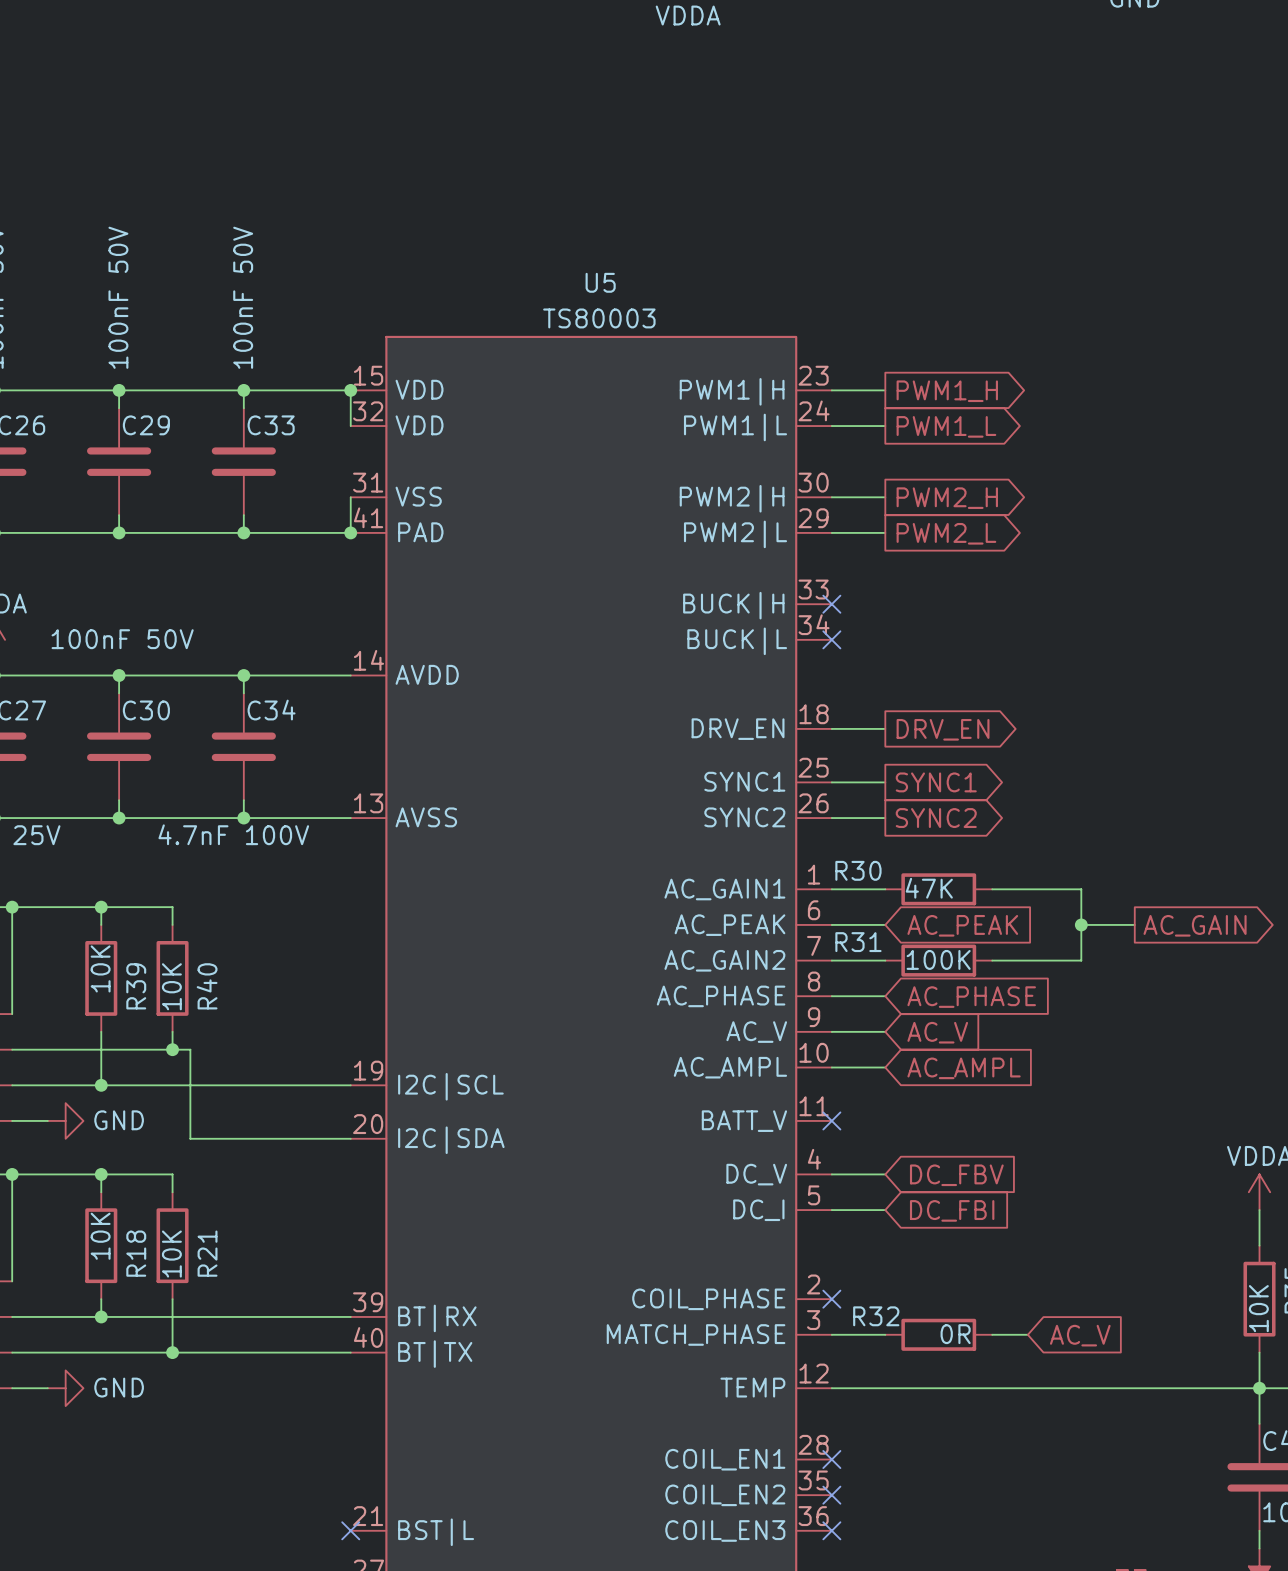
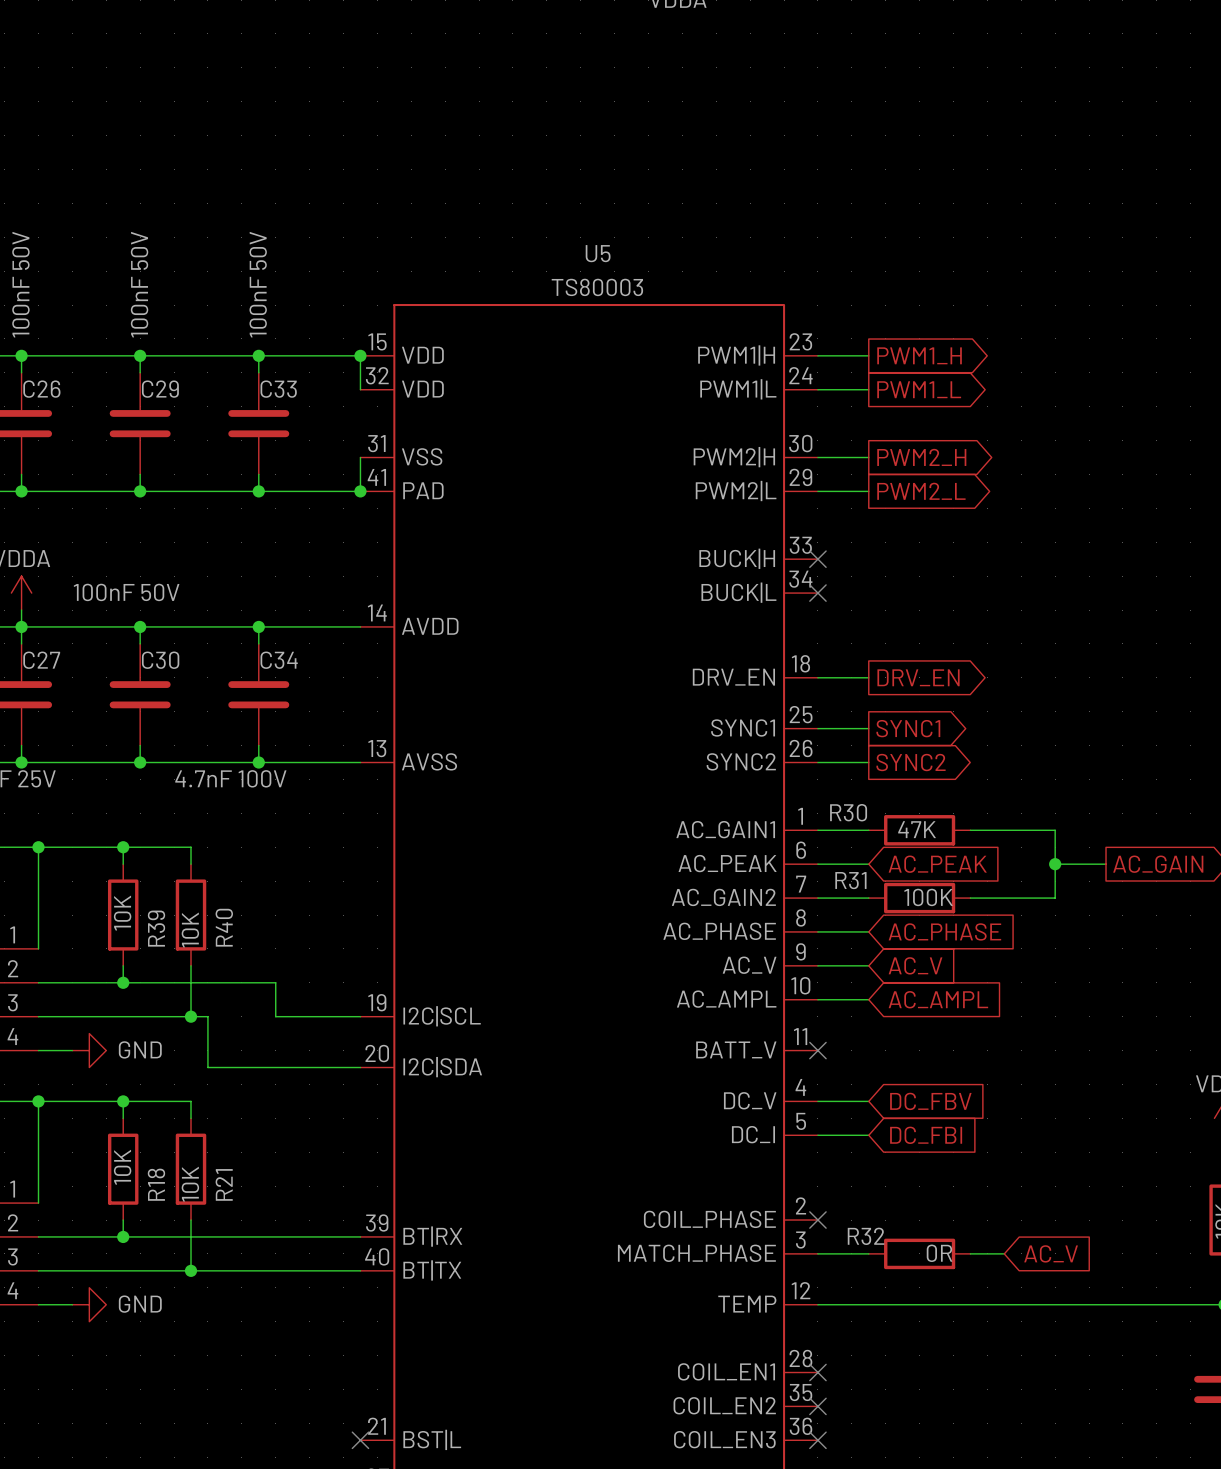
wire: (101, 1049) (101, 1085) -> (191, 982) (191, 1016)
junction: none -> (123, 982)
junction: (172, 1049) -> none
wire: (190, 1049) (190, 1085) (261, 1085) -> (207, 982) (275, 982) (275, 1016)
junction: (101, 1085) -> none
junction: none -> (191, 1016)

